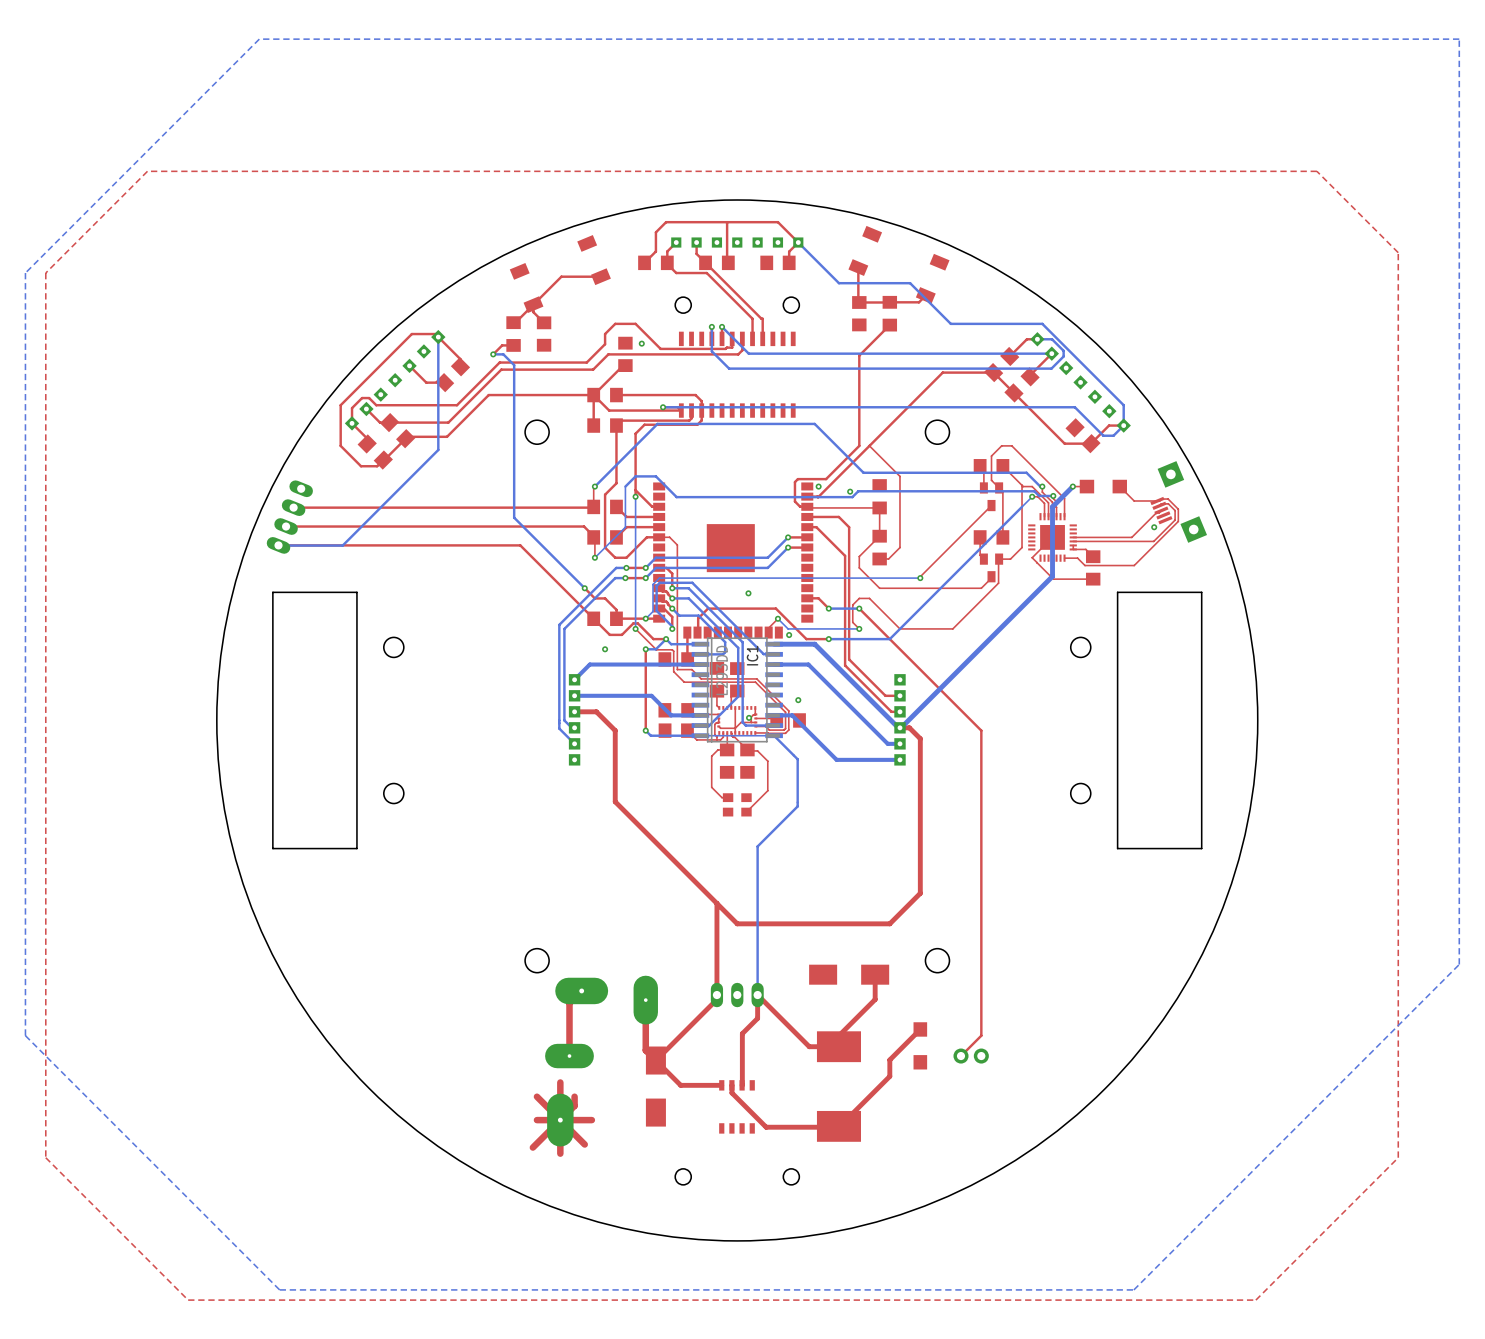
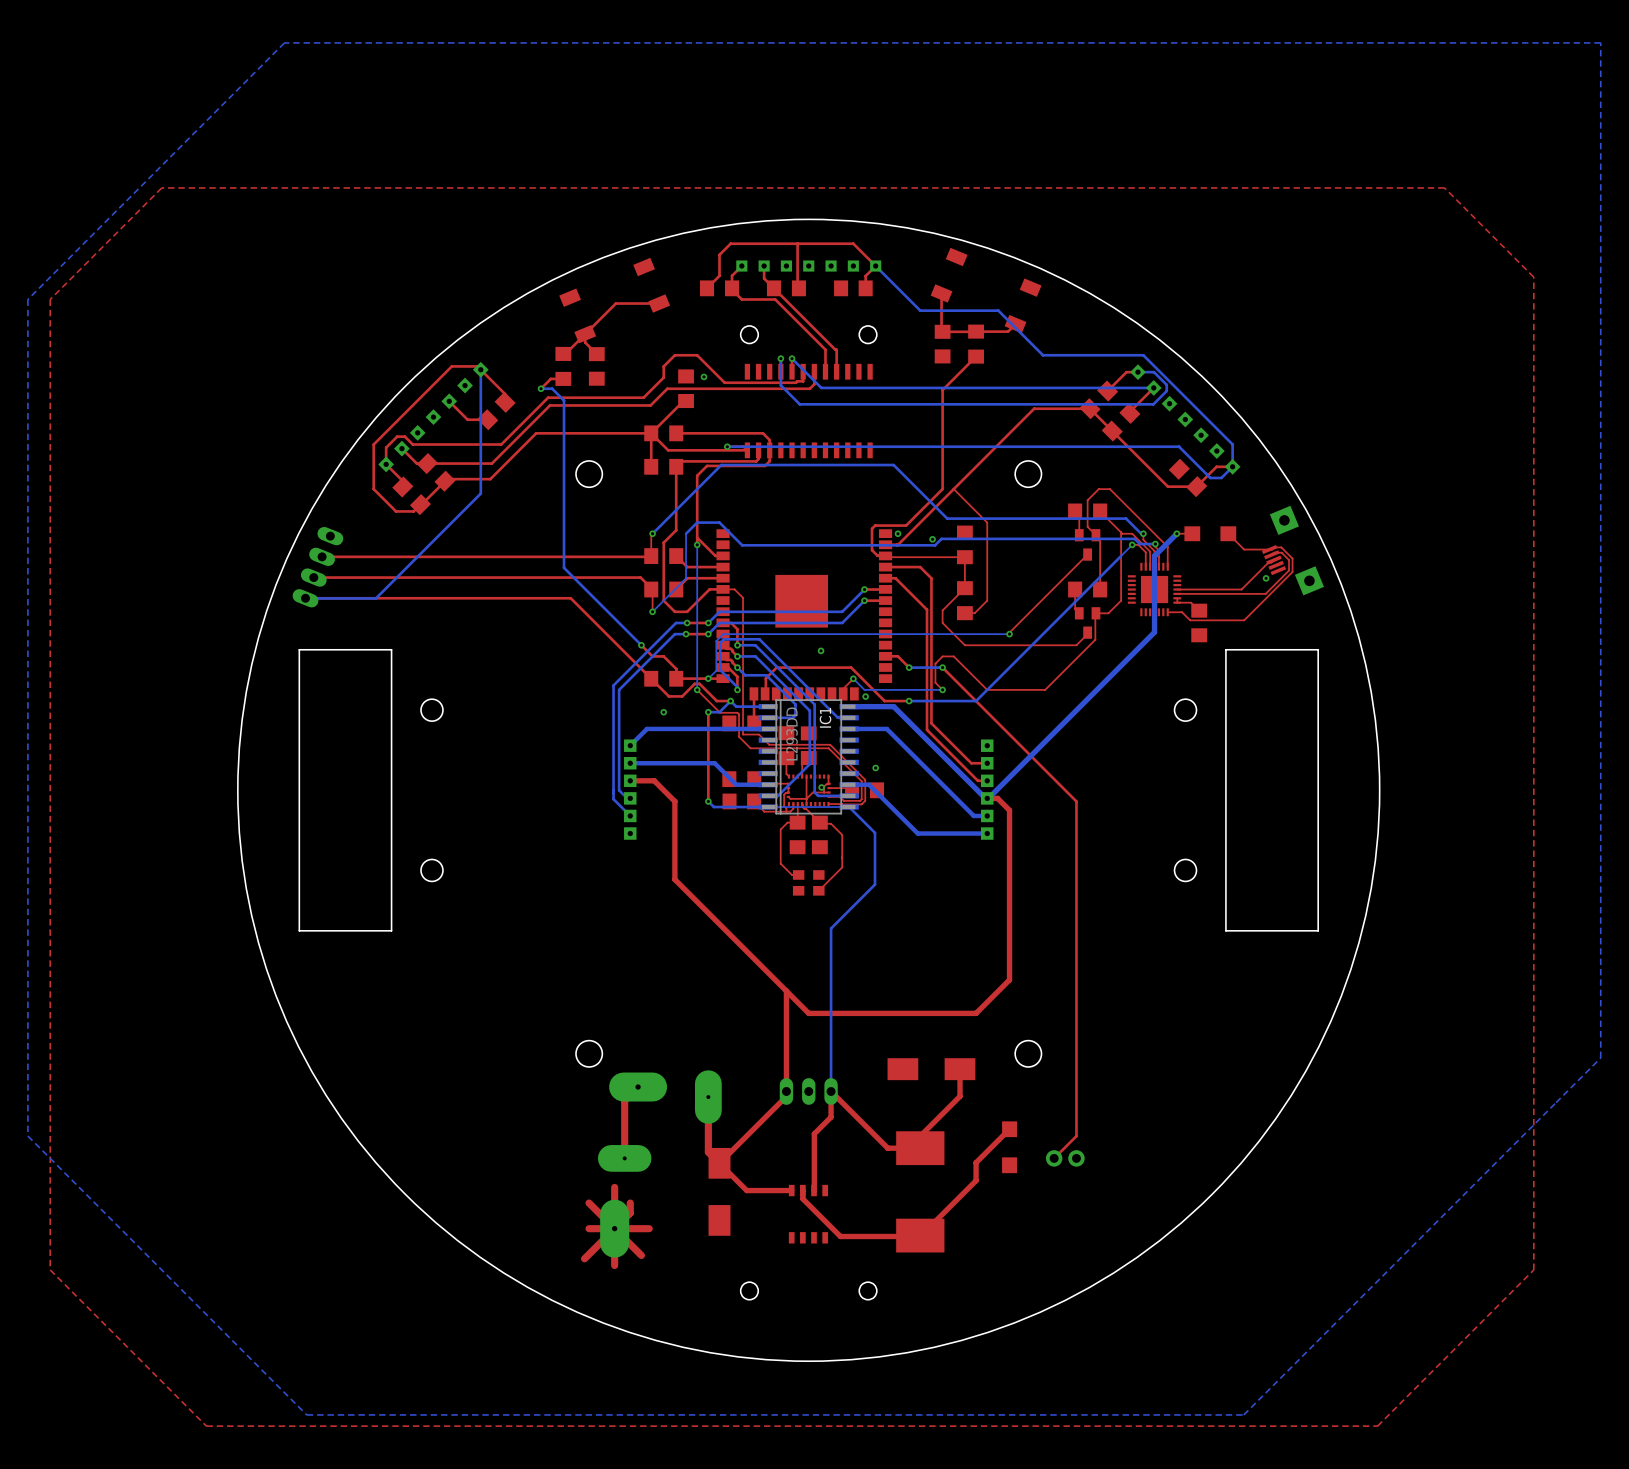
top track: (1052, 537) (1032, 557) (1037, 562) -> none
top track: (1037, 562) (1053, 579) (1093, 579) -> none

